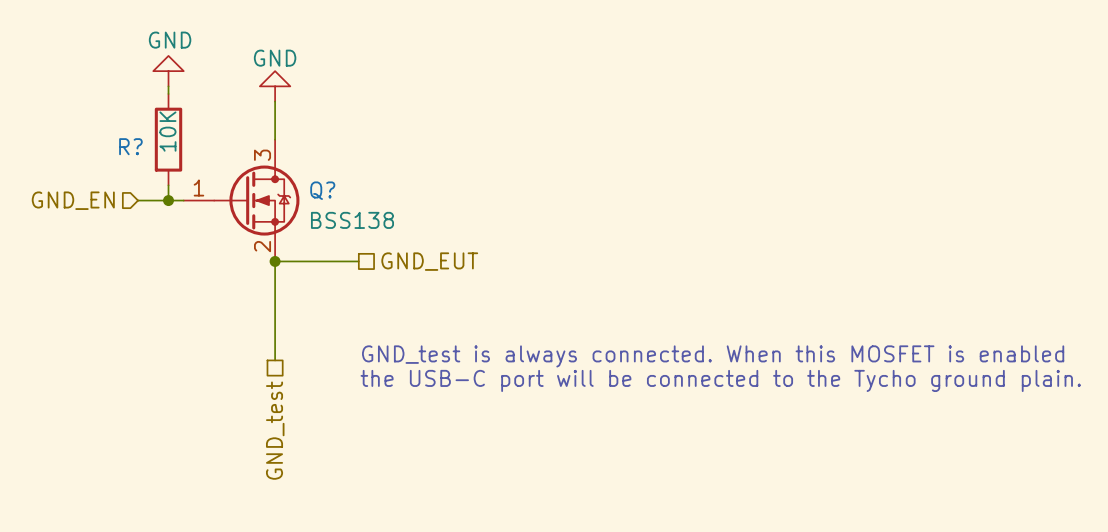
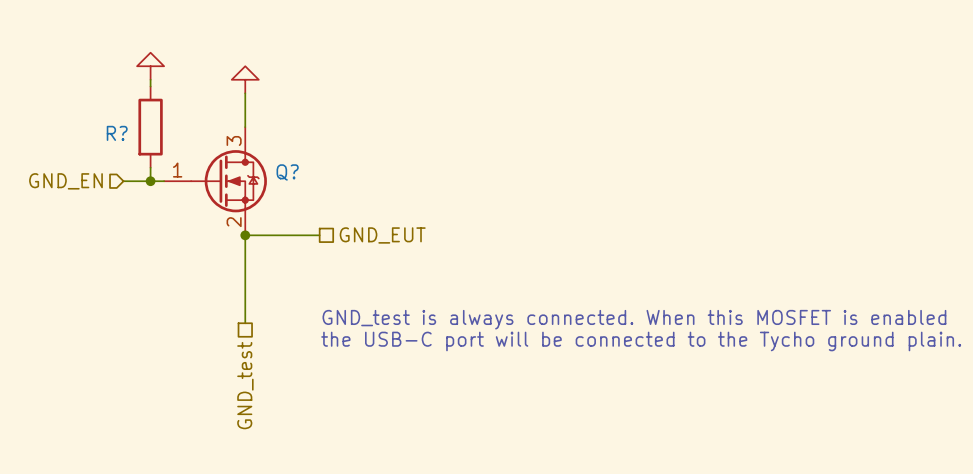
power symbol text: GND (170, 40) -> none
power symbol text: GND (275, 58) -> none
R? value: 10K (167, 131) -> none
Q? value: BSS138 (352, 220) -> none

